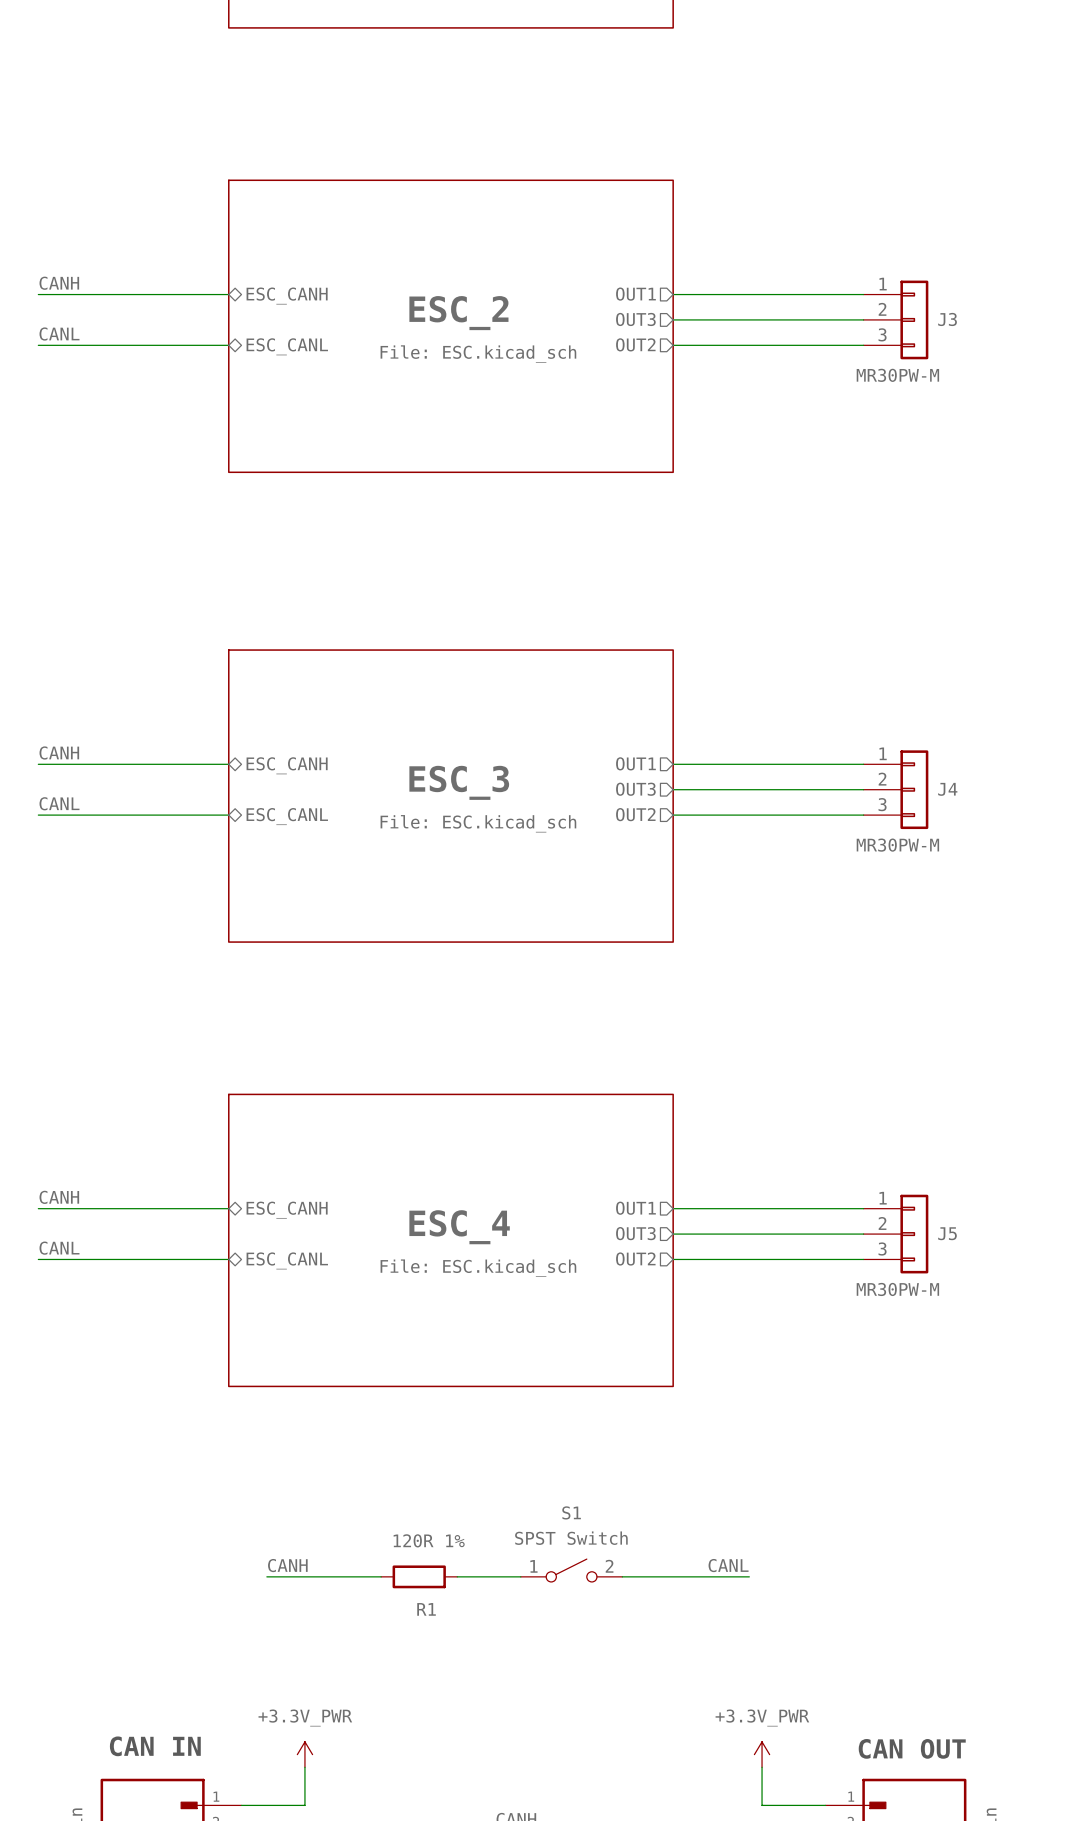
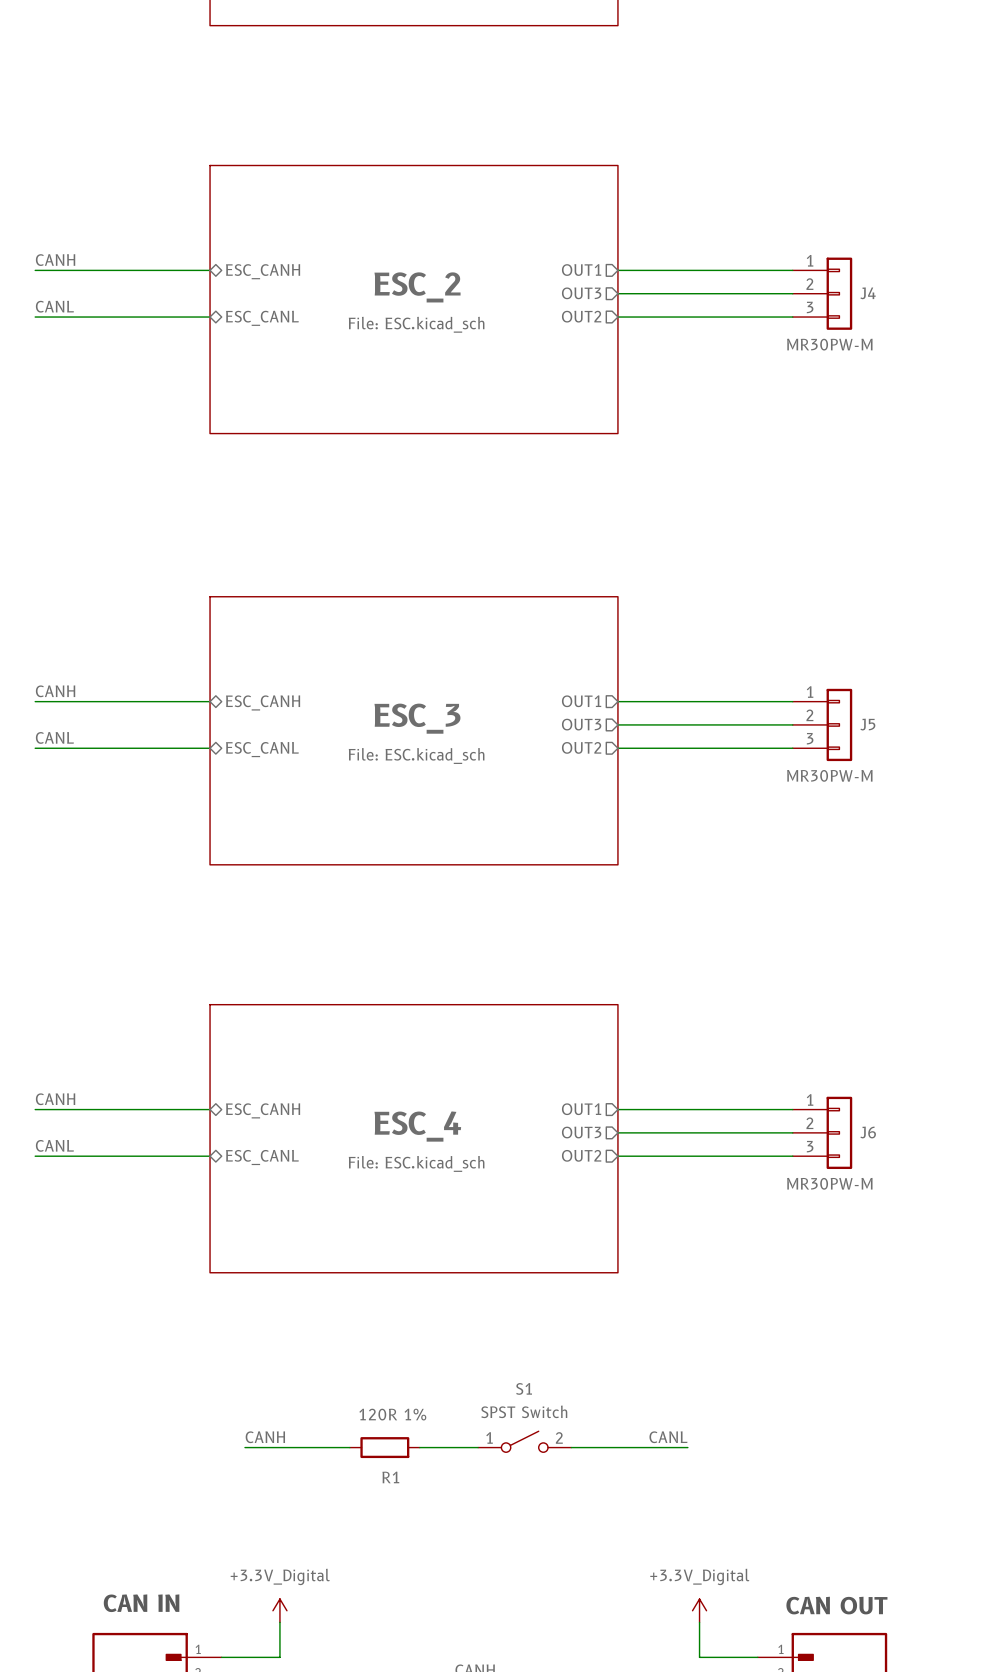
J3 name: J3 (947, 319) -> J4 (868, 293)
J4 name: J4 (947, 789) -> J5 (867, 724)
J5 name: J5 (947, 1233) -> J6 (868, 1132)
power symbol: +3.3V_PWR (304, 1754) -> +3.3V_Digital (279, 1610)
power symbol: +3.3V_PWR (762, 1754) -> +3.3V_Digital (699, 1610)

